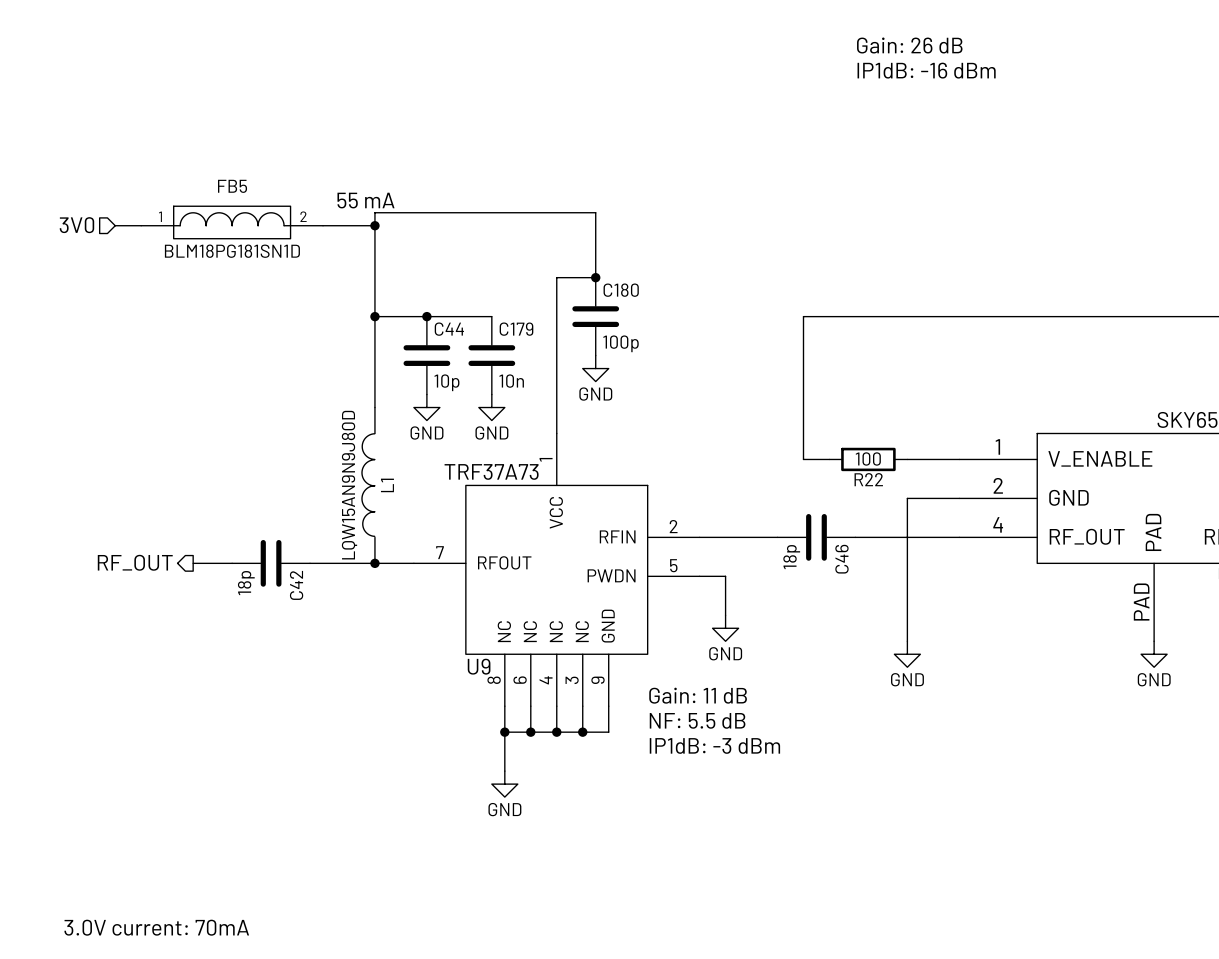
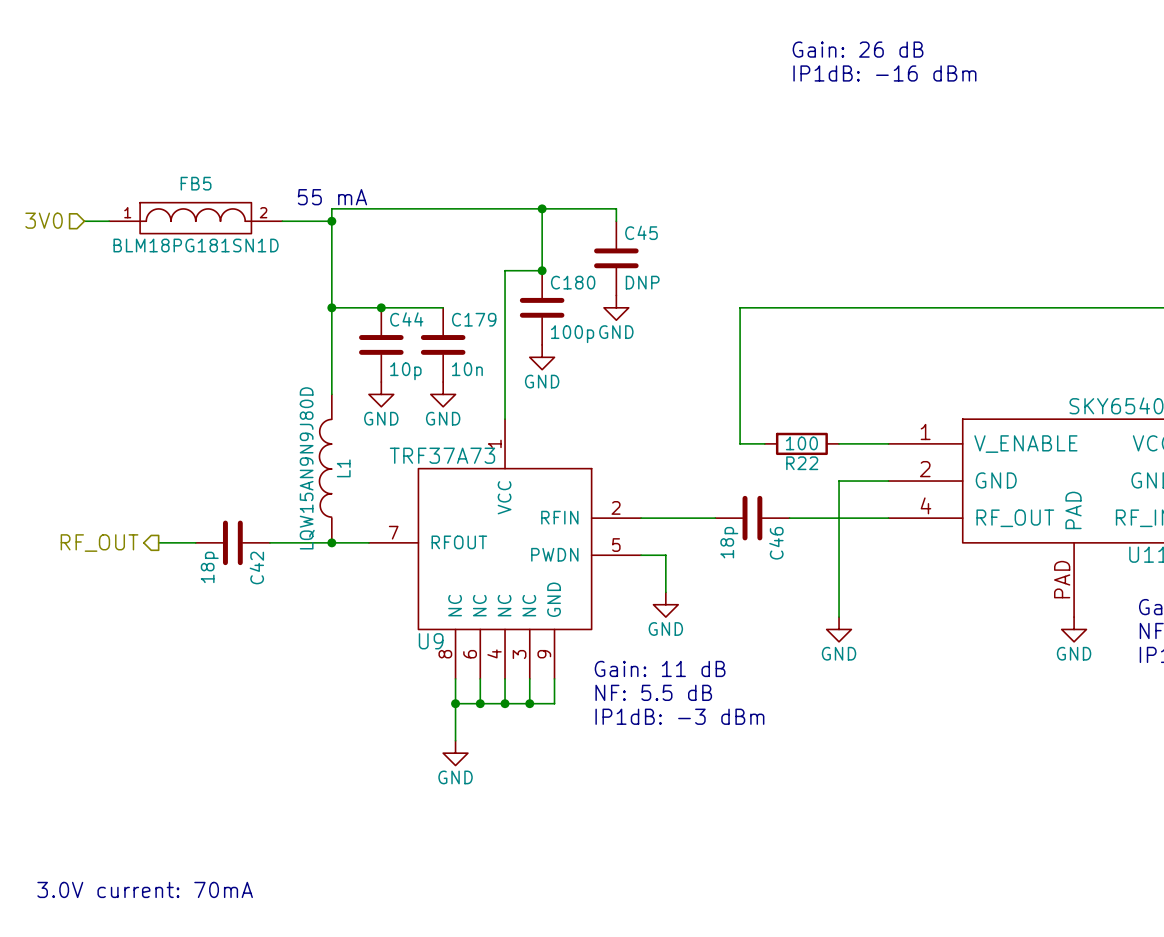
wire: none -> (542, 208) (616, 208) (616, 221)
junction: none -> (542, 208)
C45: none -> DNP (616, 258)
power symbol: none -> GND (616, 307)

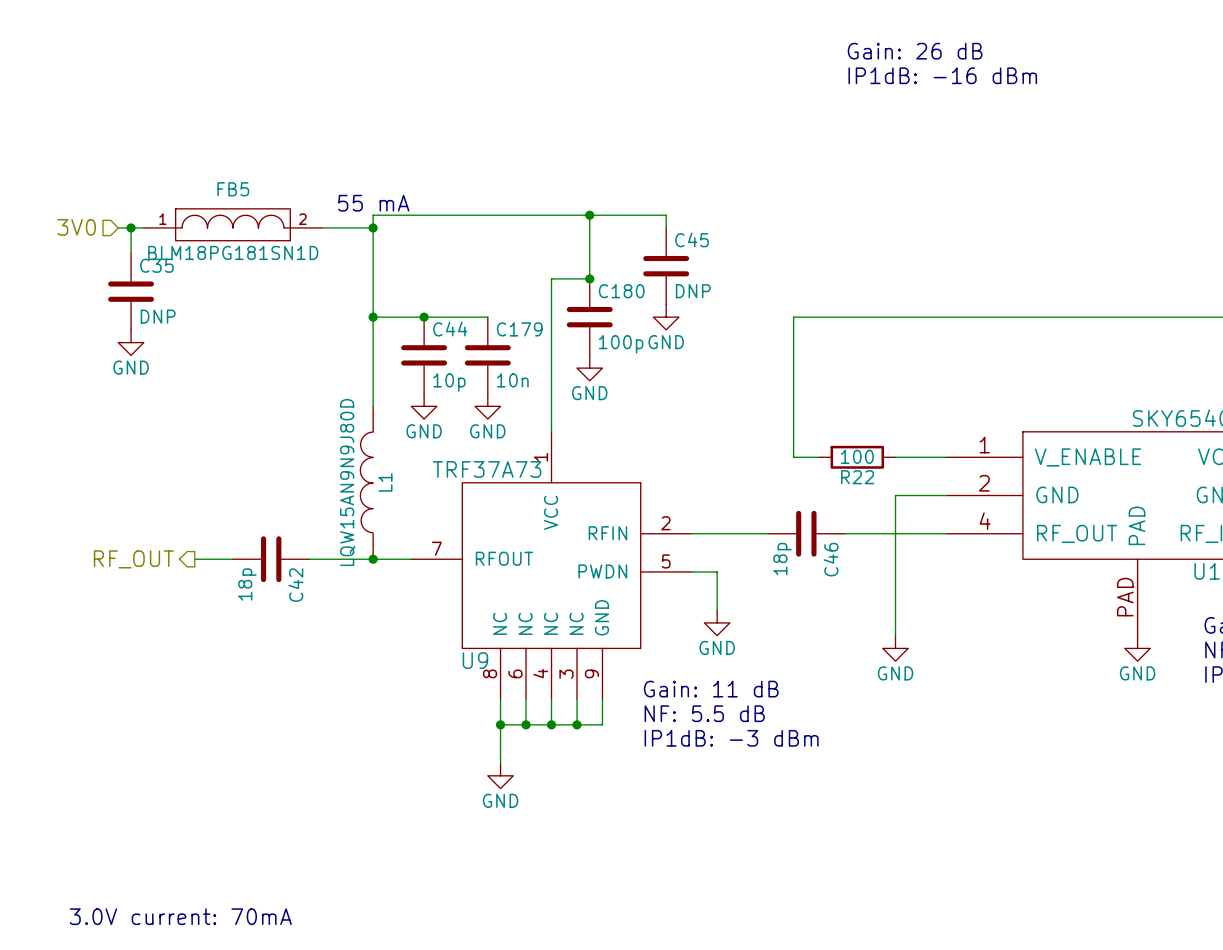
wire: none -> (131, 227) (131, 253)
junction: none -> (131, 227)
C35: none -> DNP (131, 291)
power symbol: none -> GND (131, 342)

